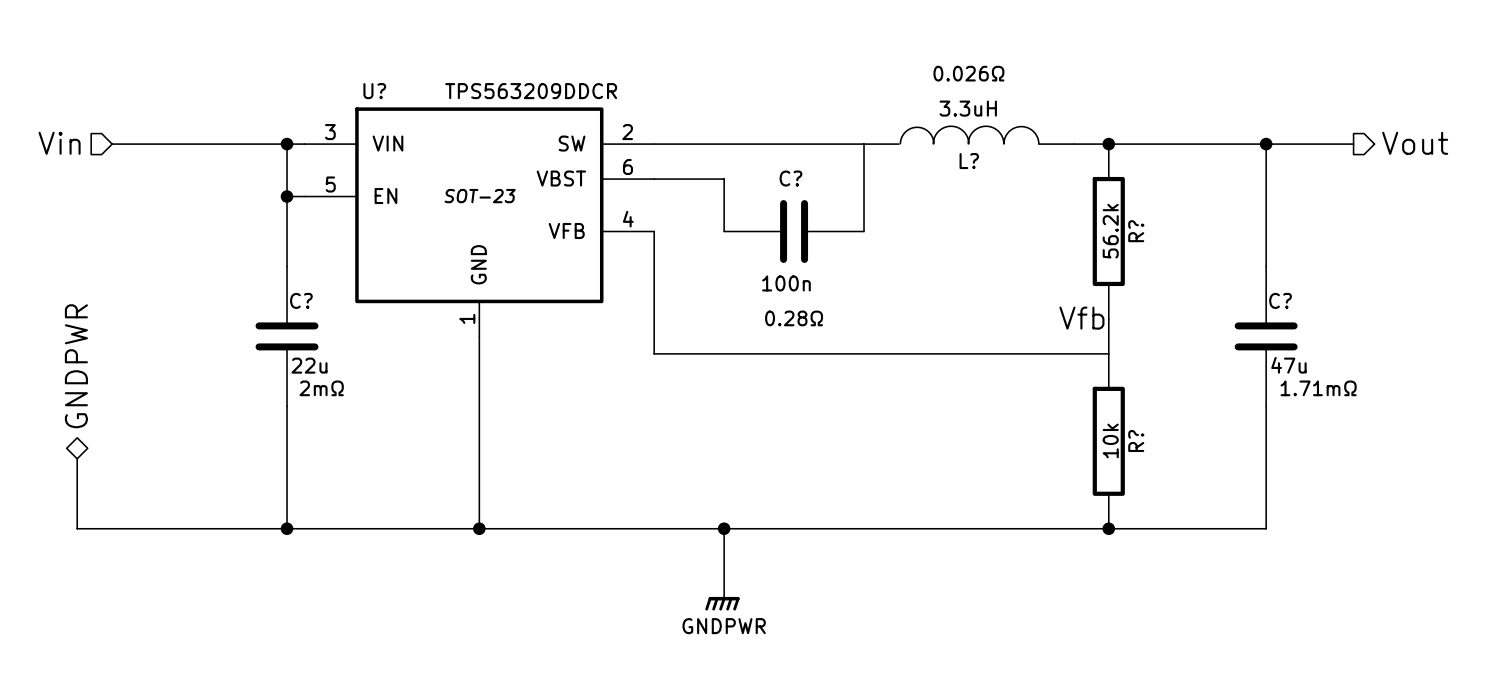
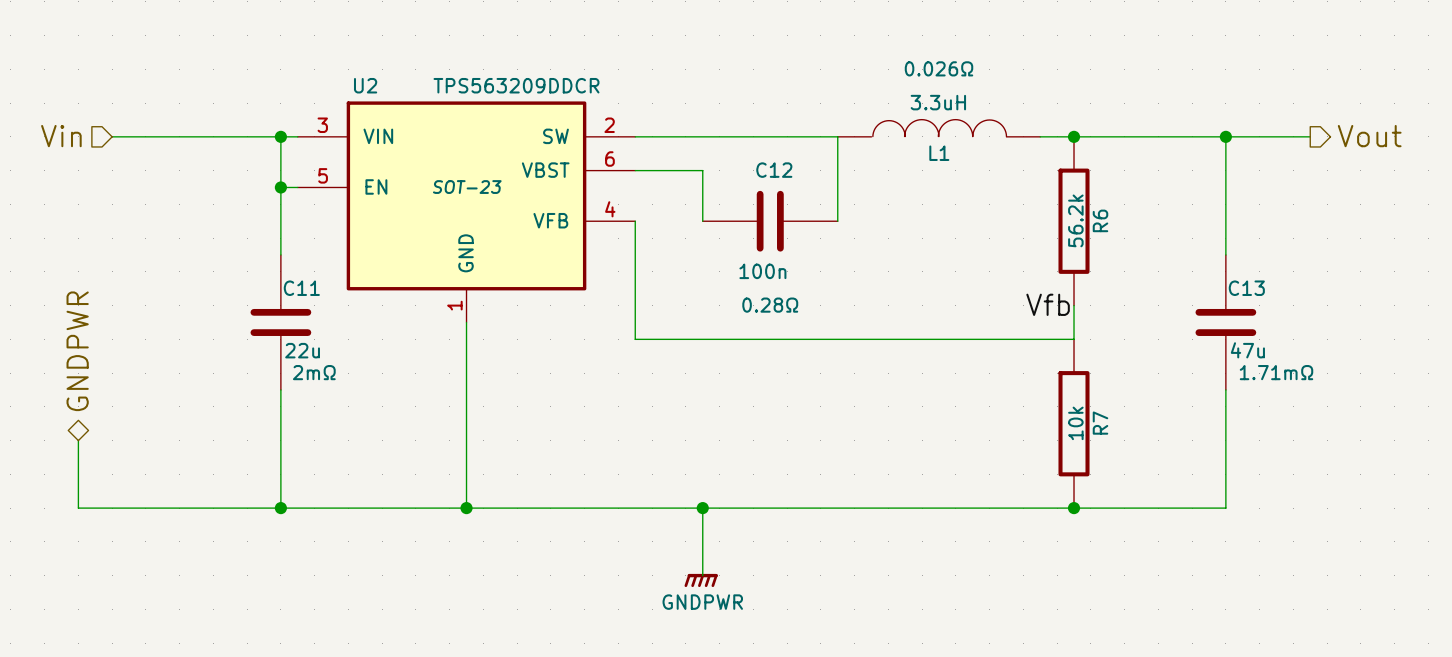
U? name: U? (374, 91) -> U2 (365, 85)
L? name: L? (969, 161) -> L1 (939, 153)
C? name: C? (790, 178) -> C12 (774, 170)
R? name: R? (1136, 231) -> R6 (1100, 220)
C? name: C? (301, 300) -> C11 (301, 288)
C? name: C? (1280, 300) -> C13 (1246, 288)
R? name: R? (1136, 440) -> R7 (1100, 423)

